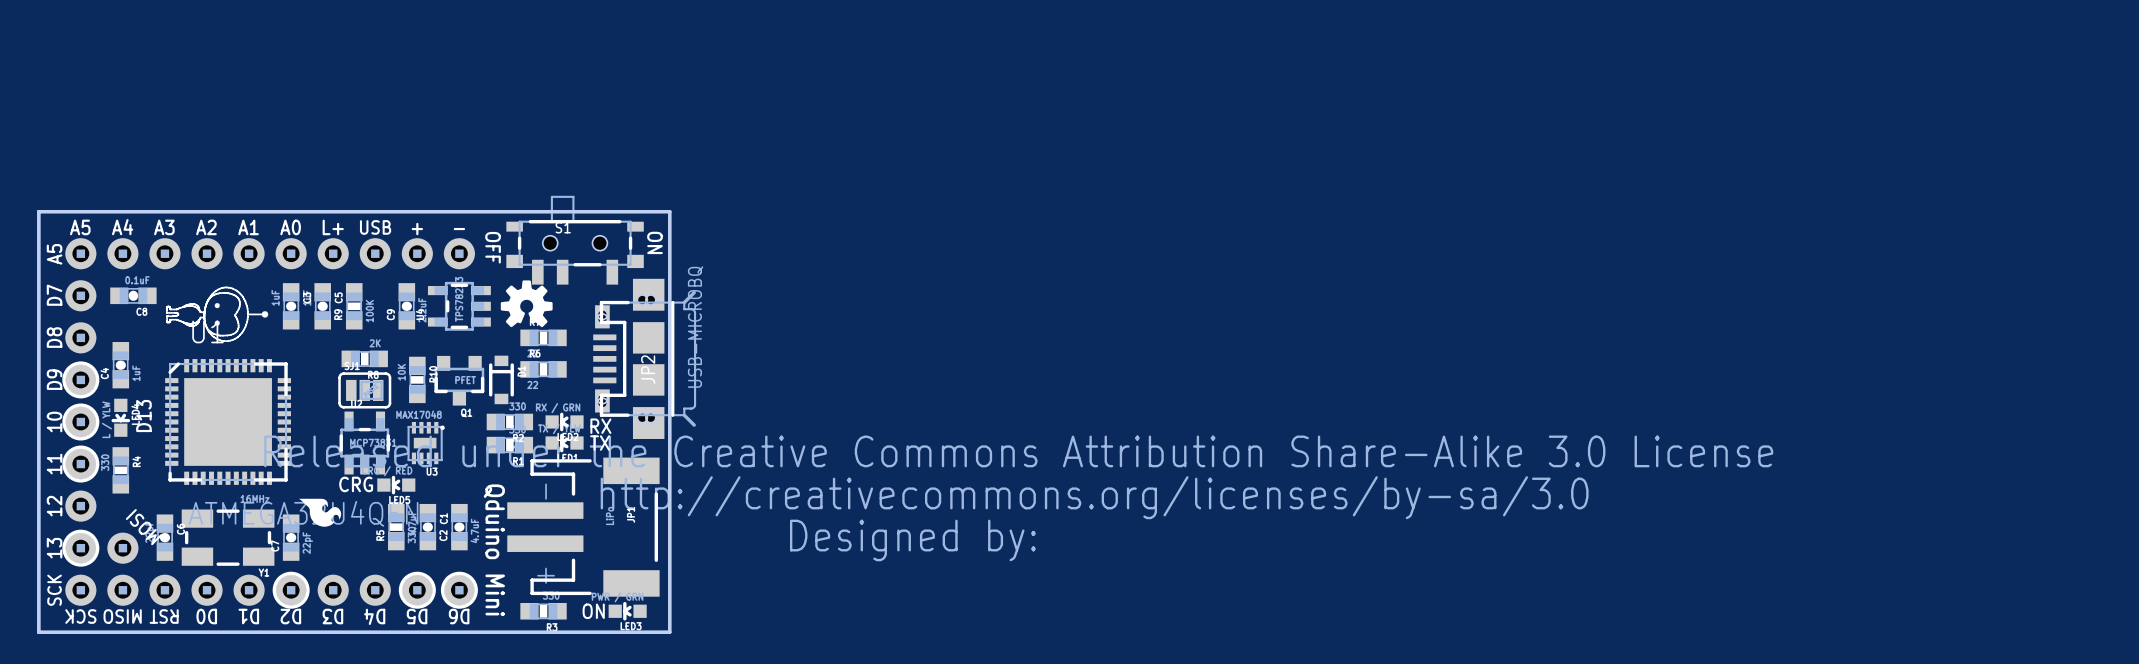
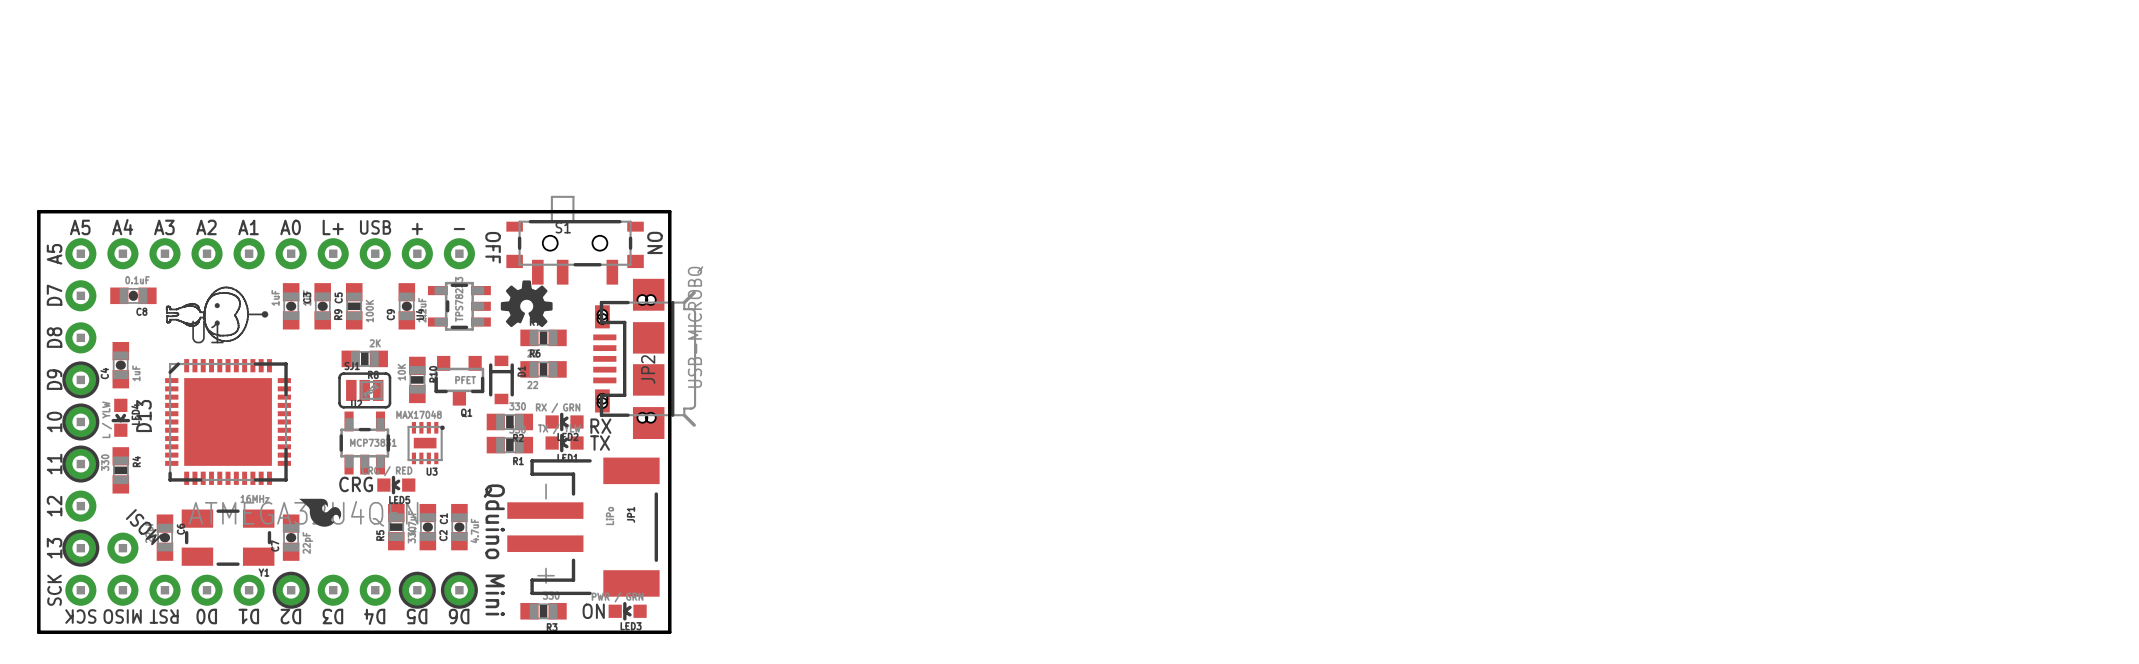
drawing: [264, 435, 1774, 562] -> none

